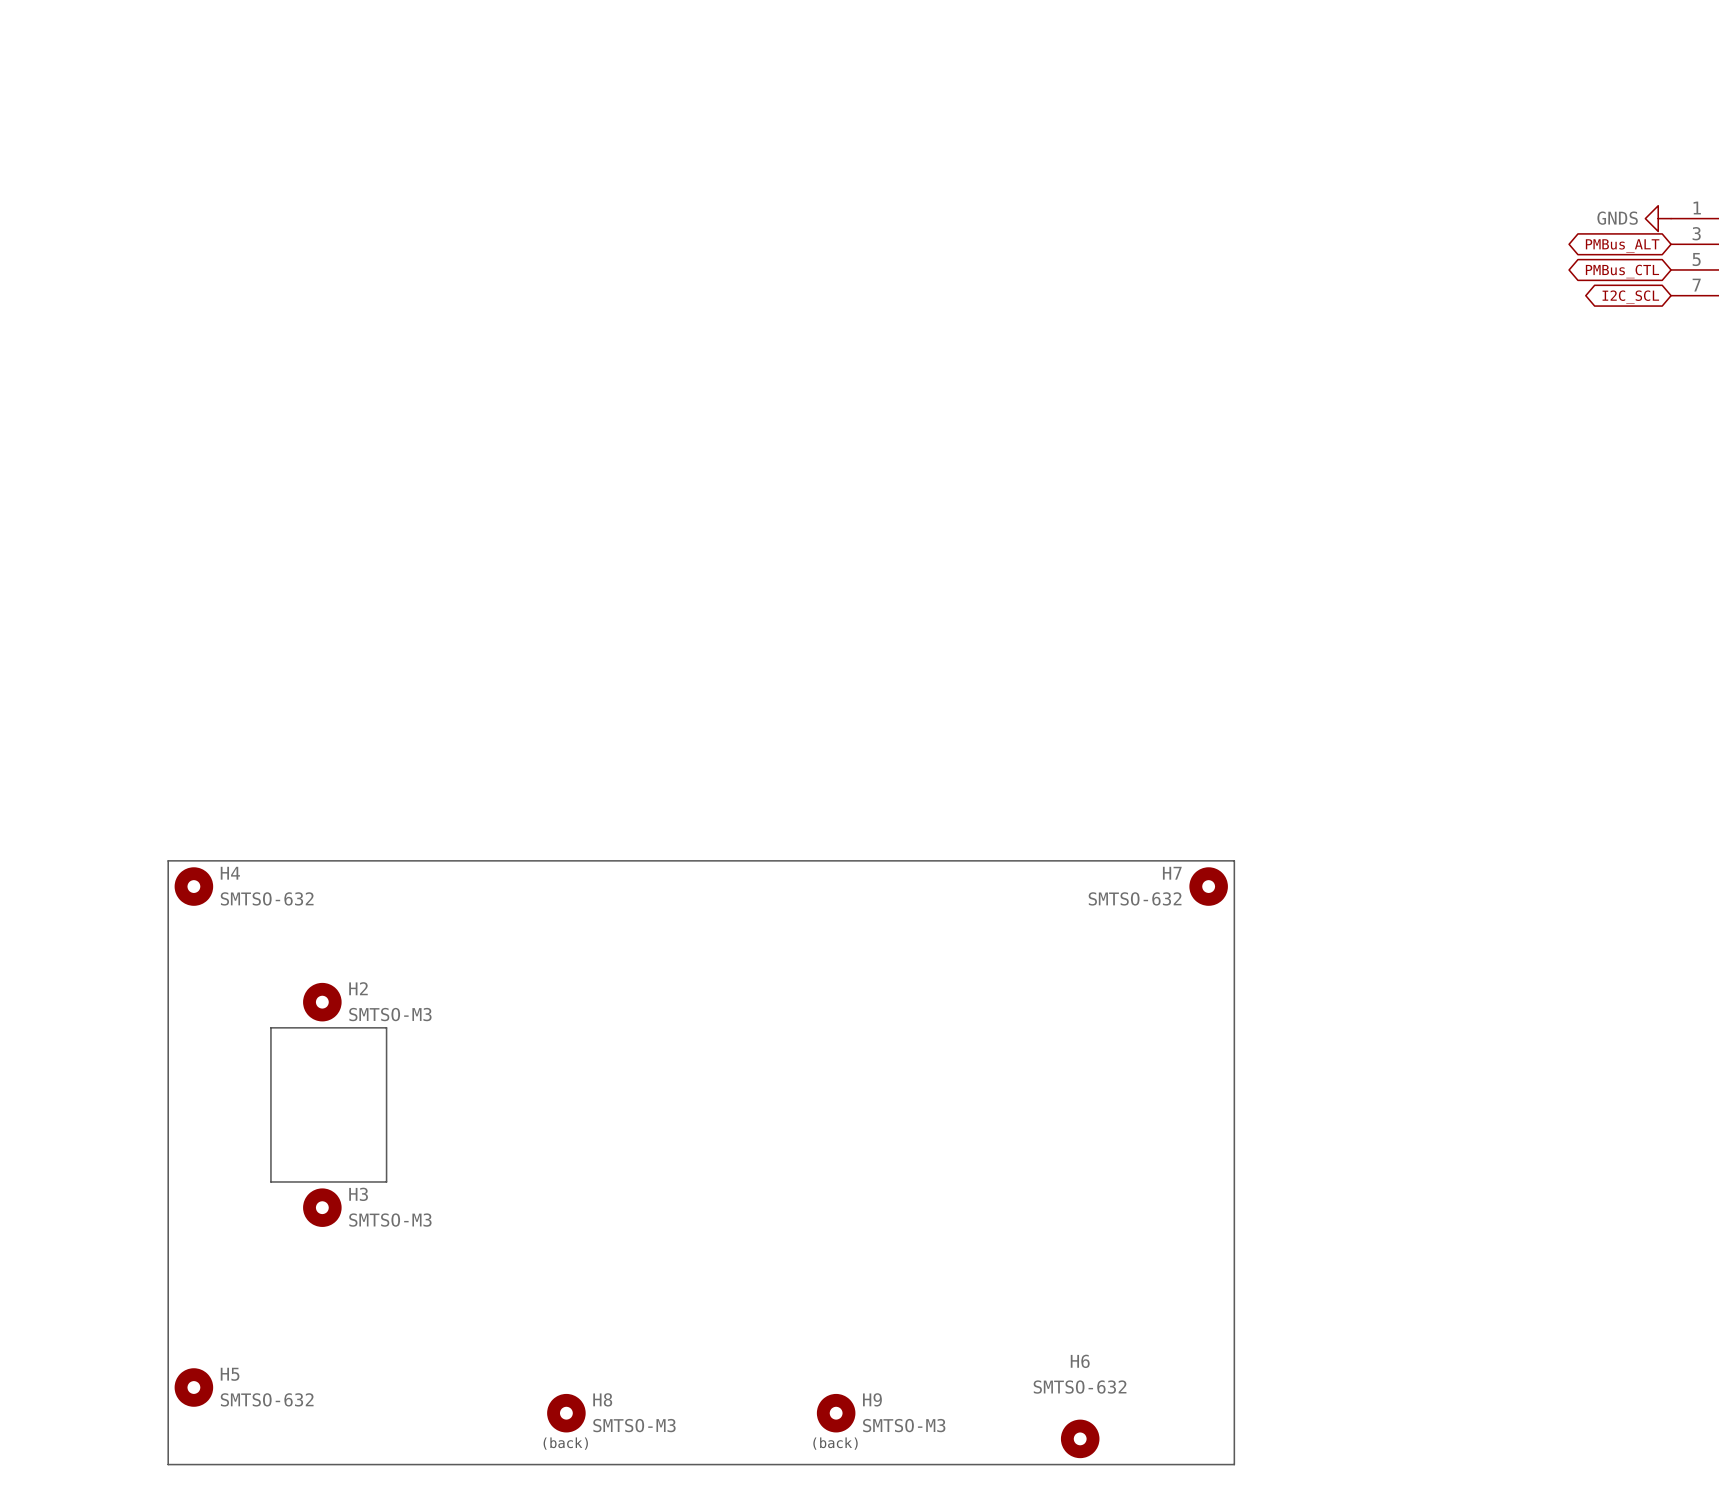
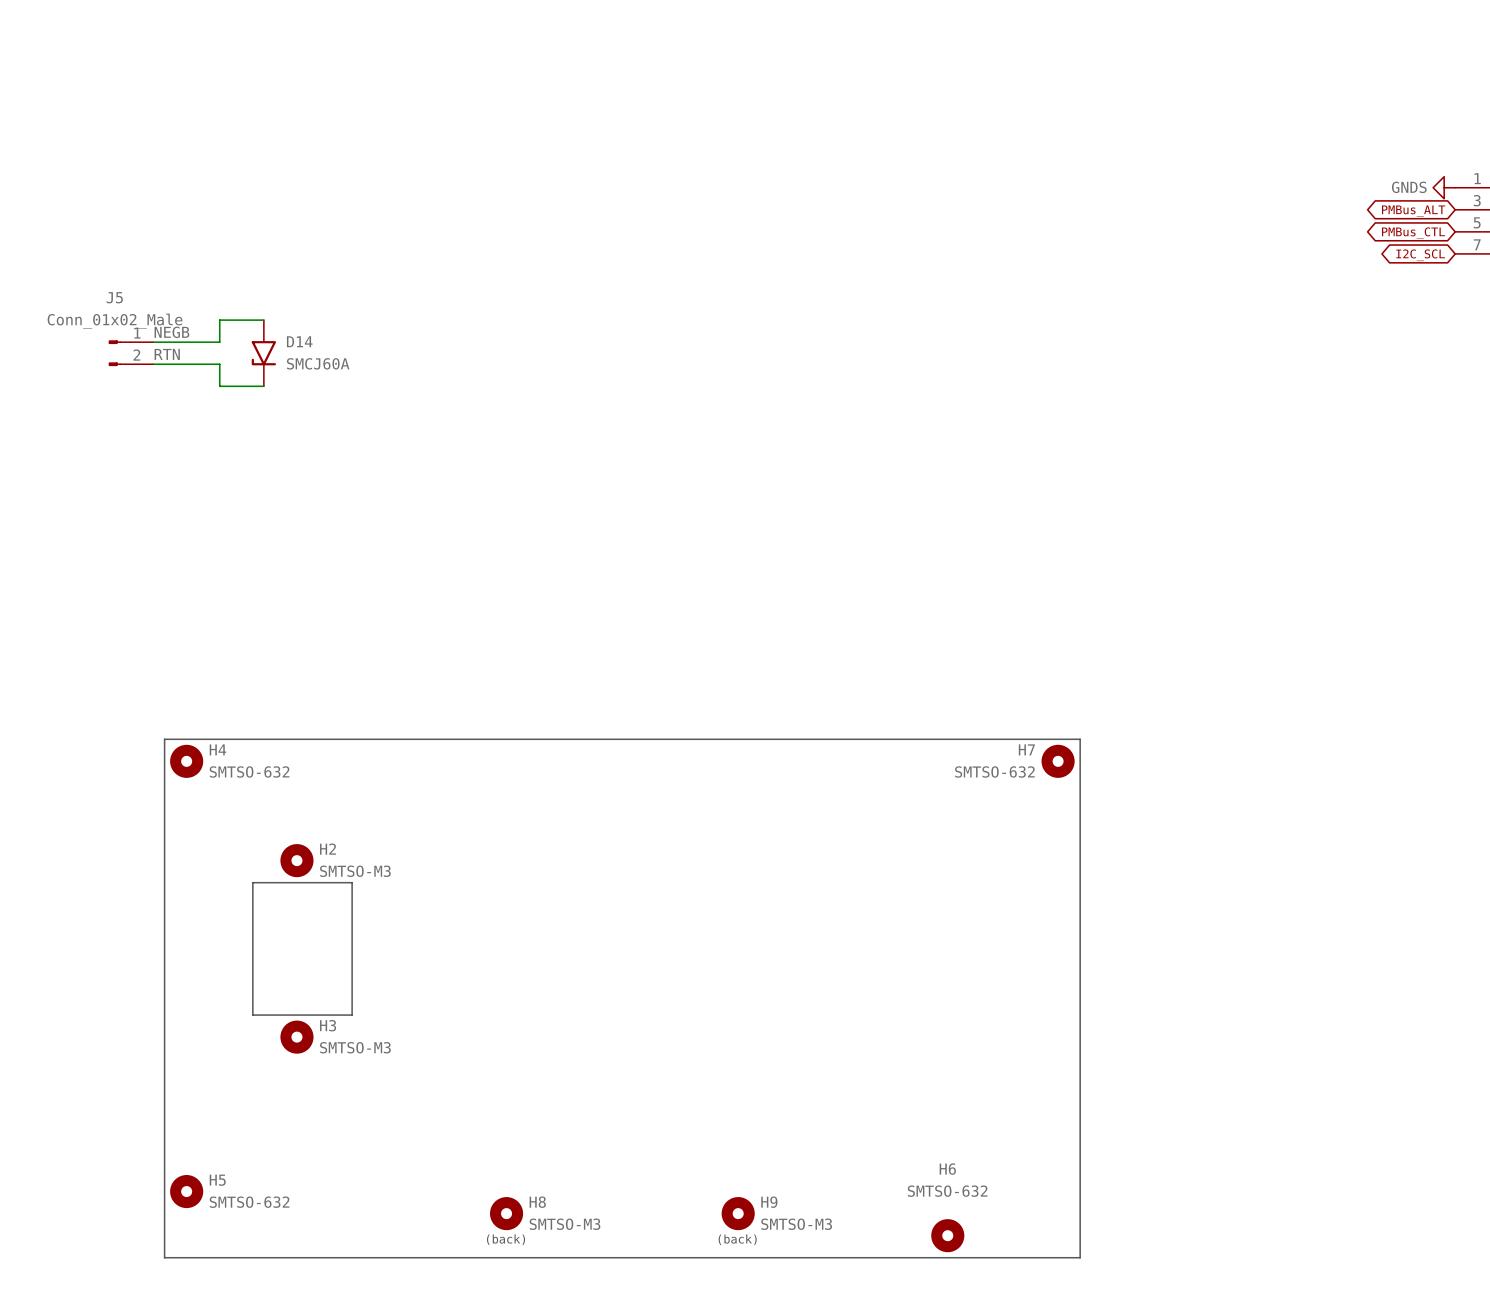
wire: none -> (263, 320) (219, 320) (219, 342) (153, 342)
label: none -> NEGB (171, 332)
J5: none -> Conn_01x02_Male (131, 353)
D14: none -> SMCJ60A (263, 353)
label: none -> RTN (167, 354)
wire: none -> (153, 364) (219, 364) (219, 386) (263, 386)

